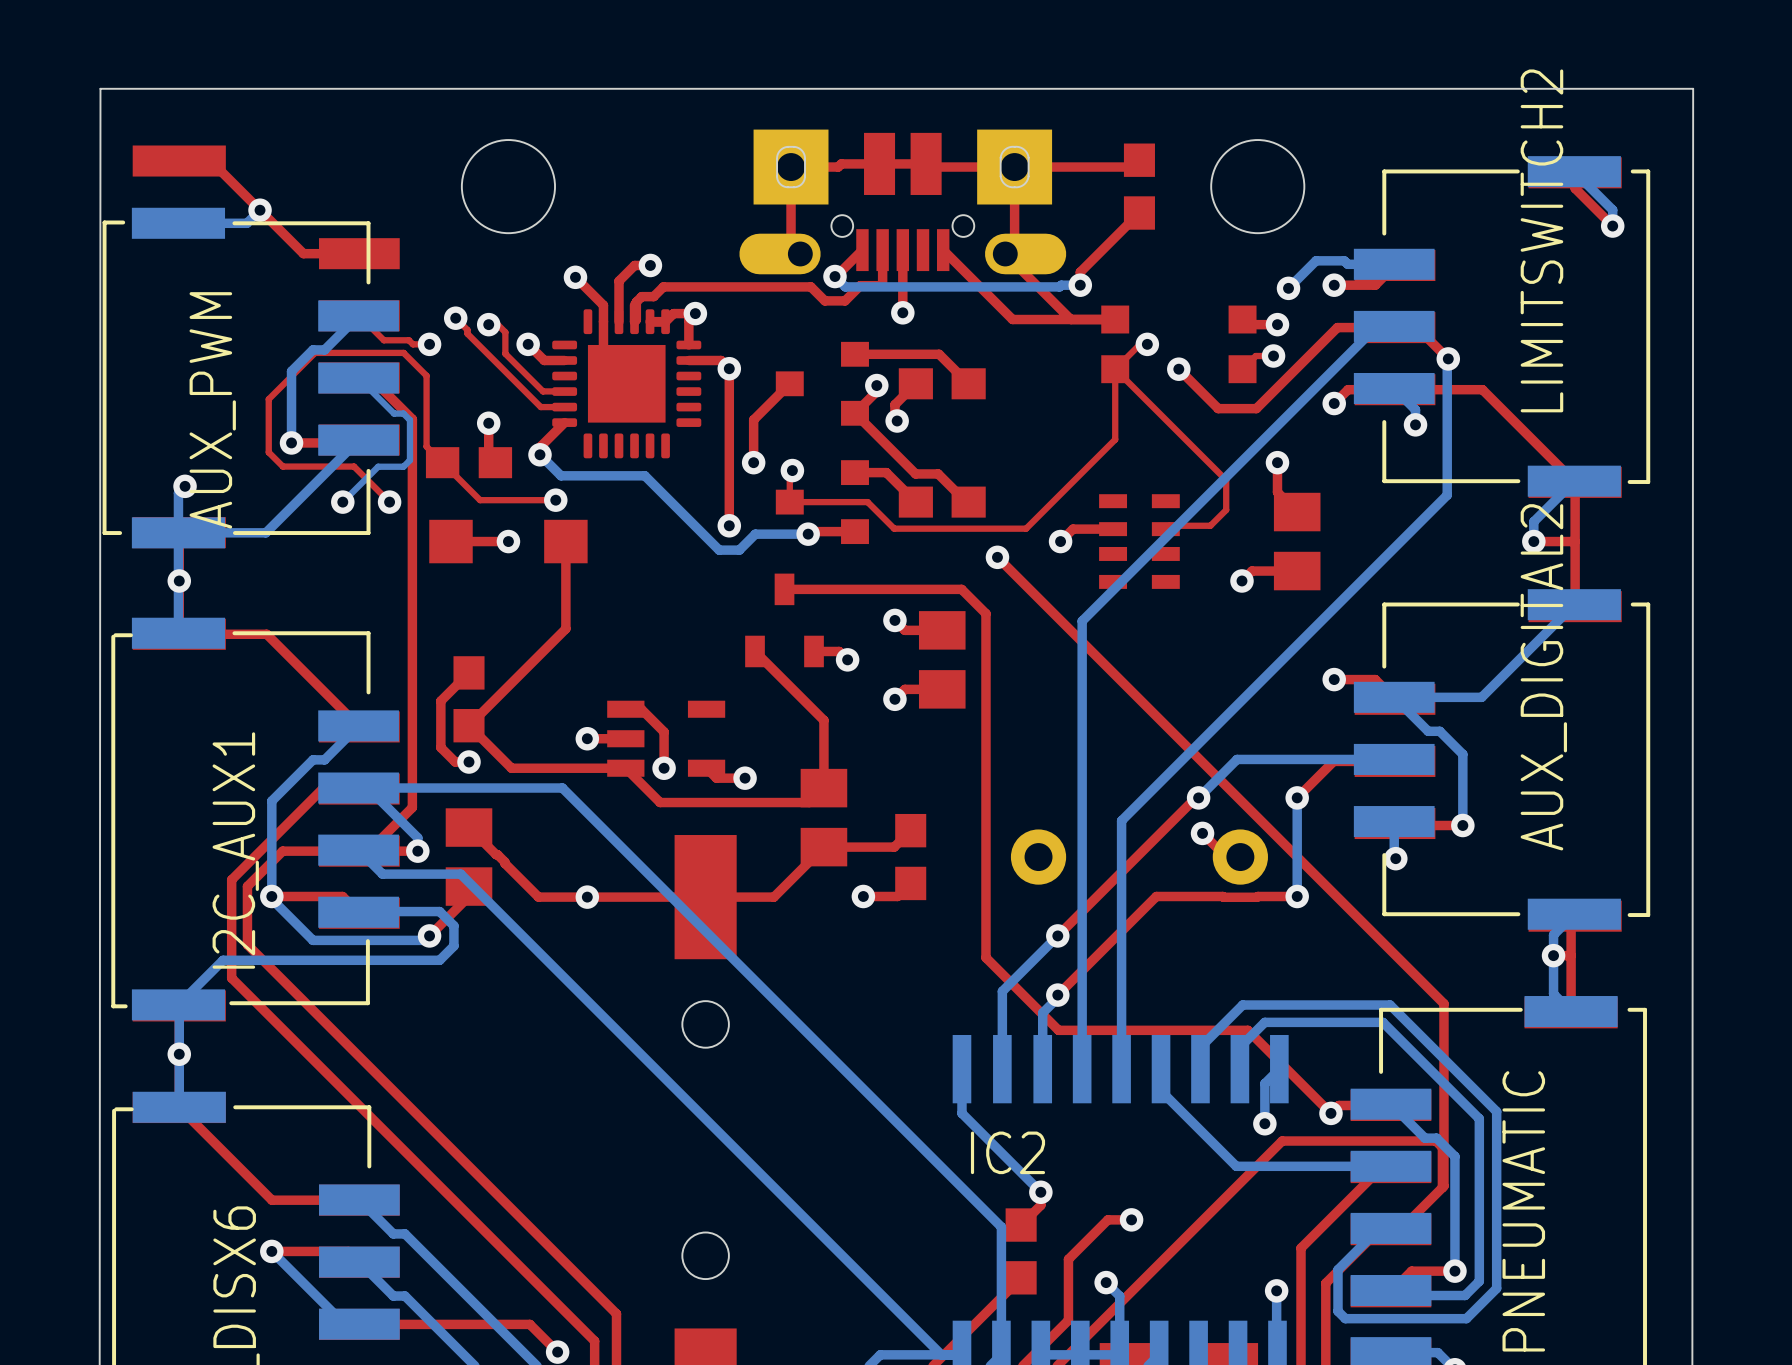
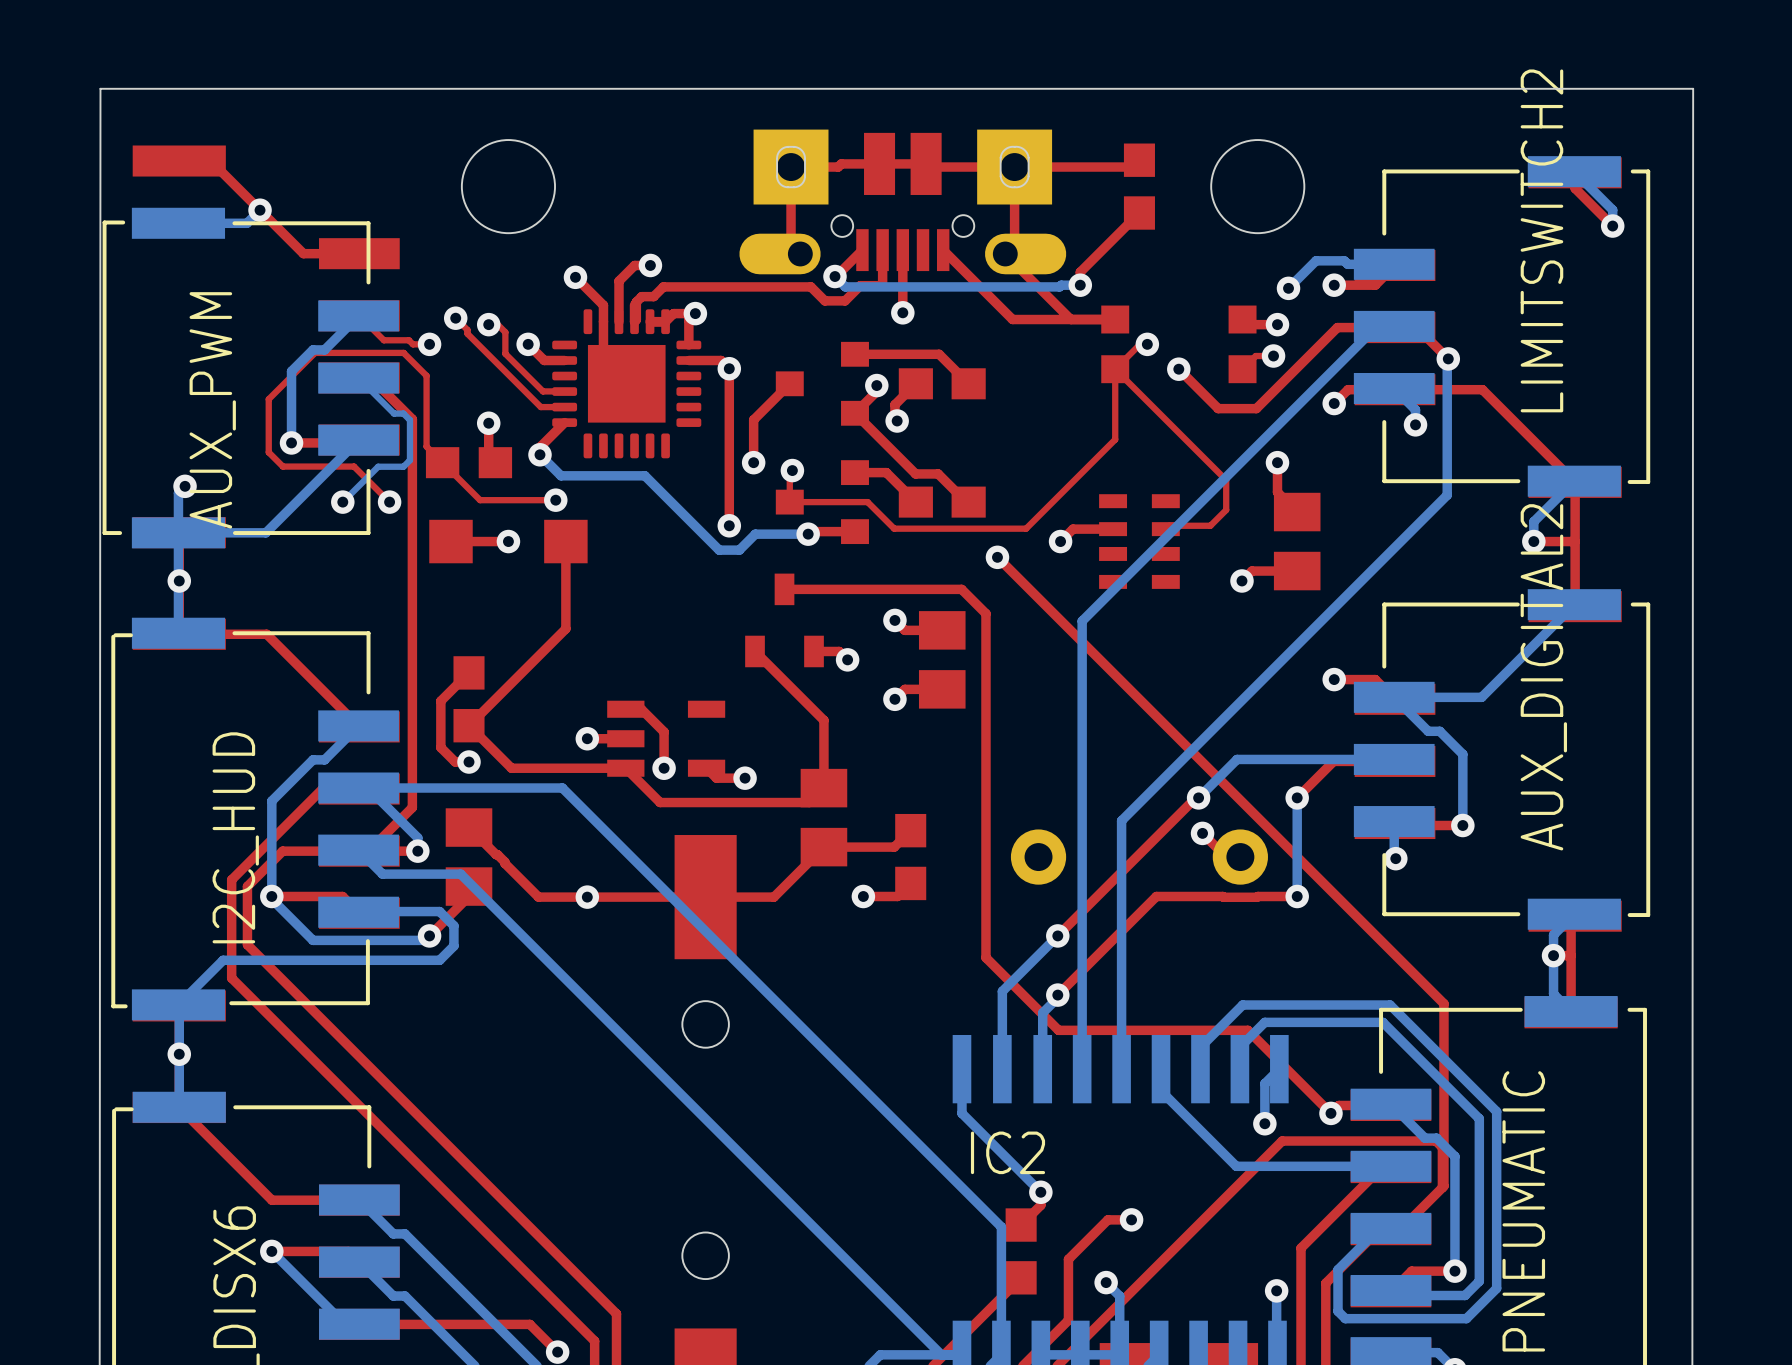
I2C_AUX1 name: I2C_AUX1 (235, 850) -> I2C_HUD (235, 837)

